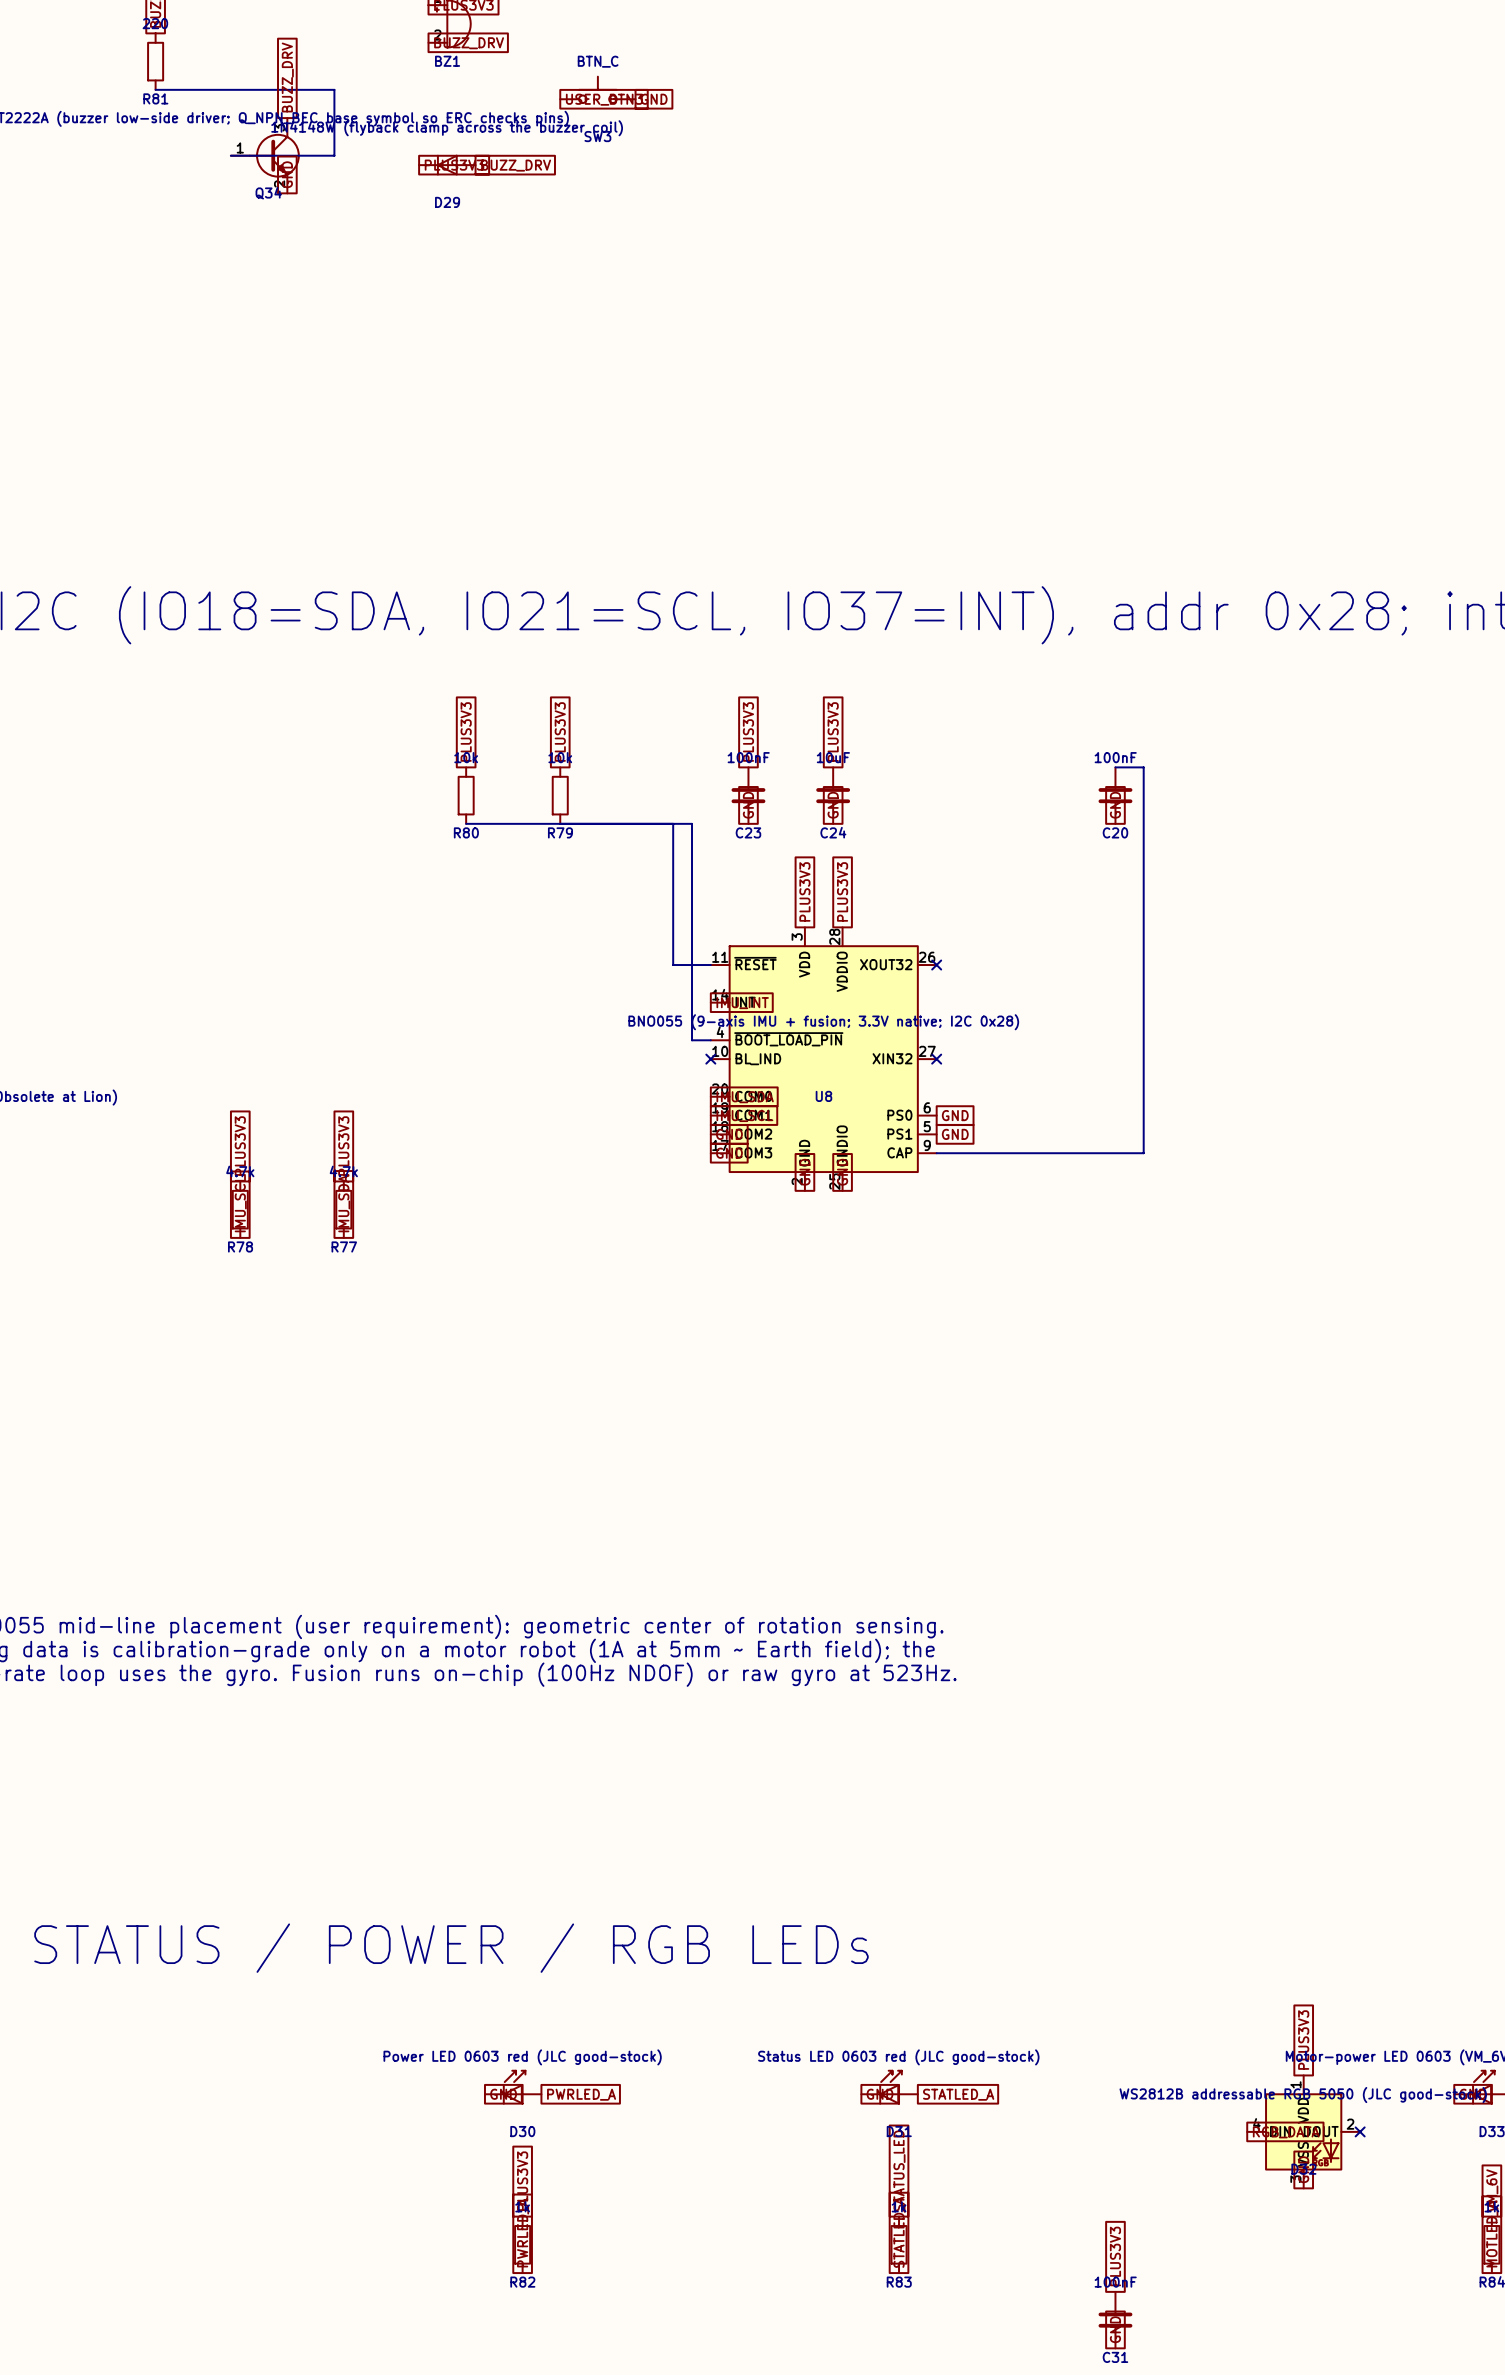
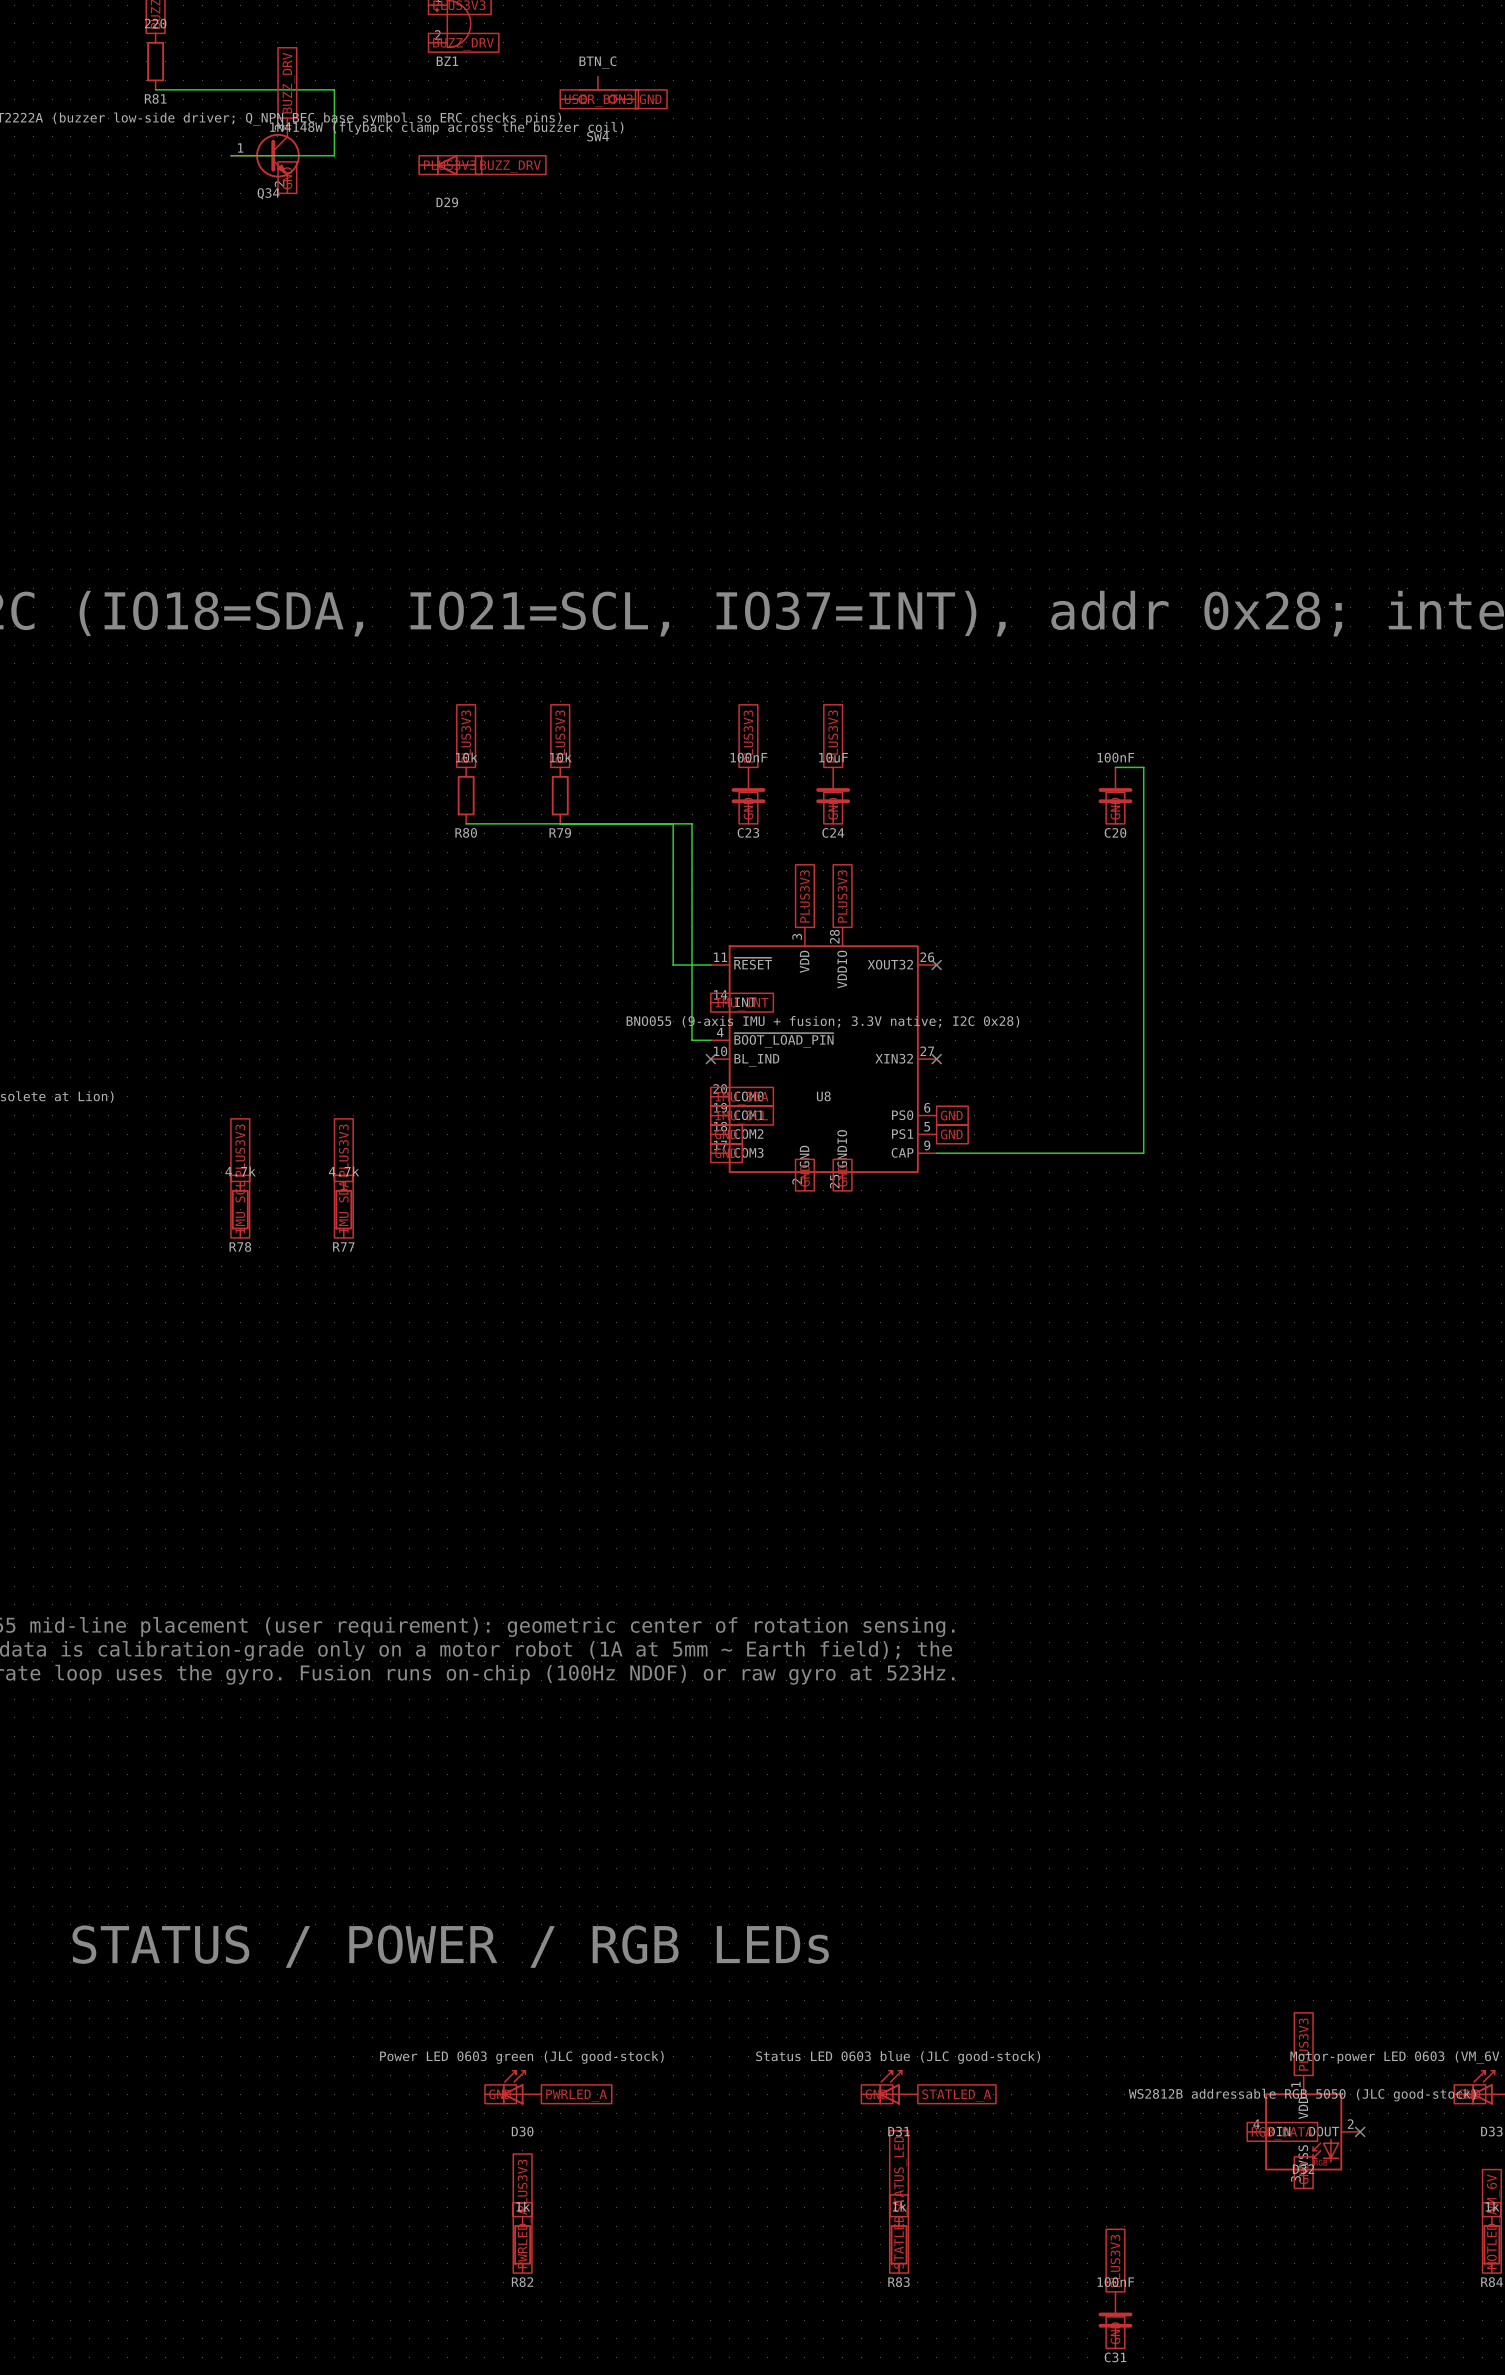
SW3 name: SW3 (597, 136) -> SW4 (598, 136)
D30 value: Power LED 0603 red (JLC good-stock) (522, 2057) -> Power LED 0603 green (JLC good-stock) (521, 2057)
D31 value: Status LED 0603 red (JLC good-stock) (898, 2057) -> Status LED 0603 blue (JLC good-stock) (898, 2057)

